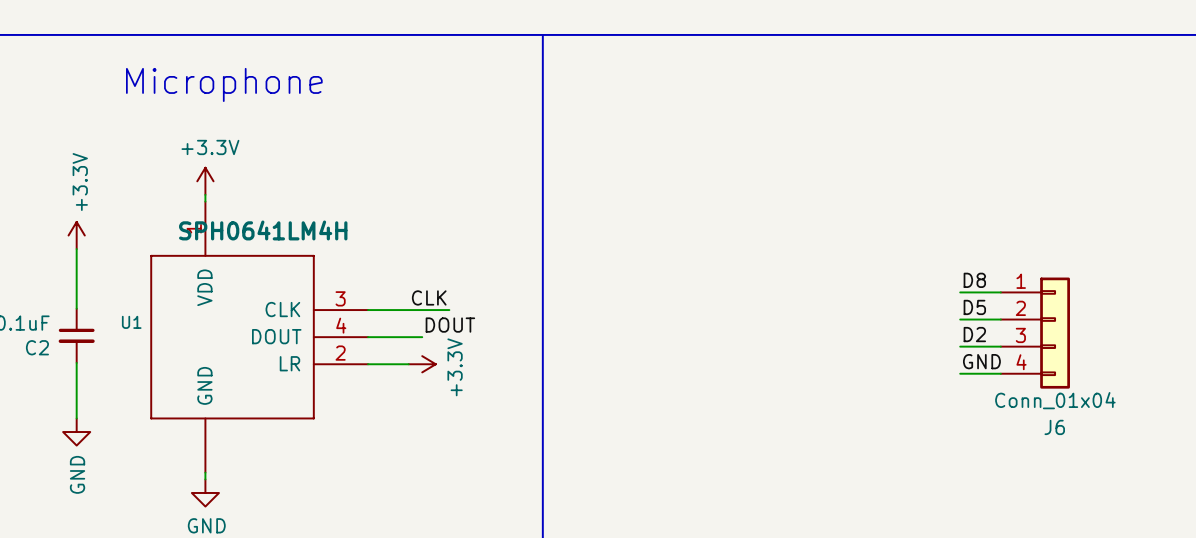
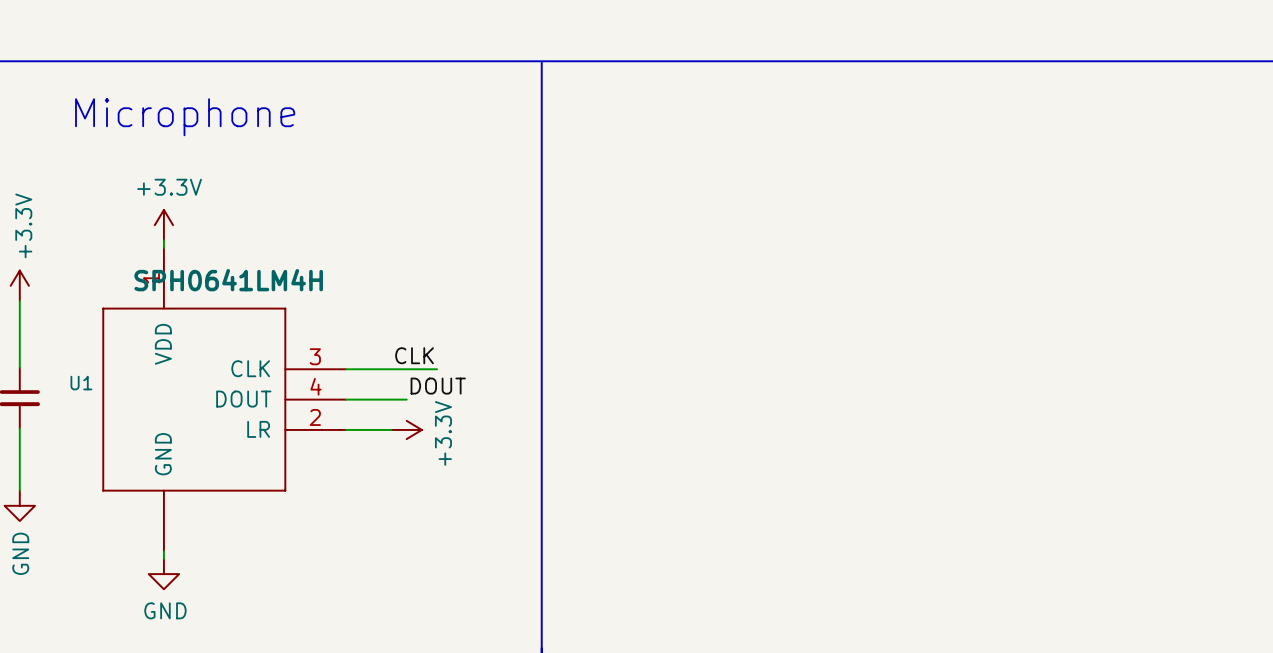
label: D8 (974, 280) -> none
wire: (960, 292) (1000, 292) -> none
label: D5 (974, 307) -> none
wire: (960, 319) (1000, 319) -> none
J6: Conn_01x04 (1035, 333) -> none
label: D2 (974, 334) -> none
wire: (960, 346) (1000, 346) -> none
label: GND (981, 361) -> none
wire: (960, 373) (1000, 373) -> none

